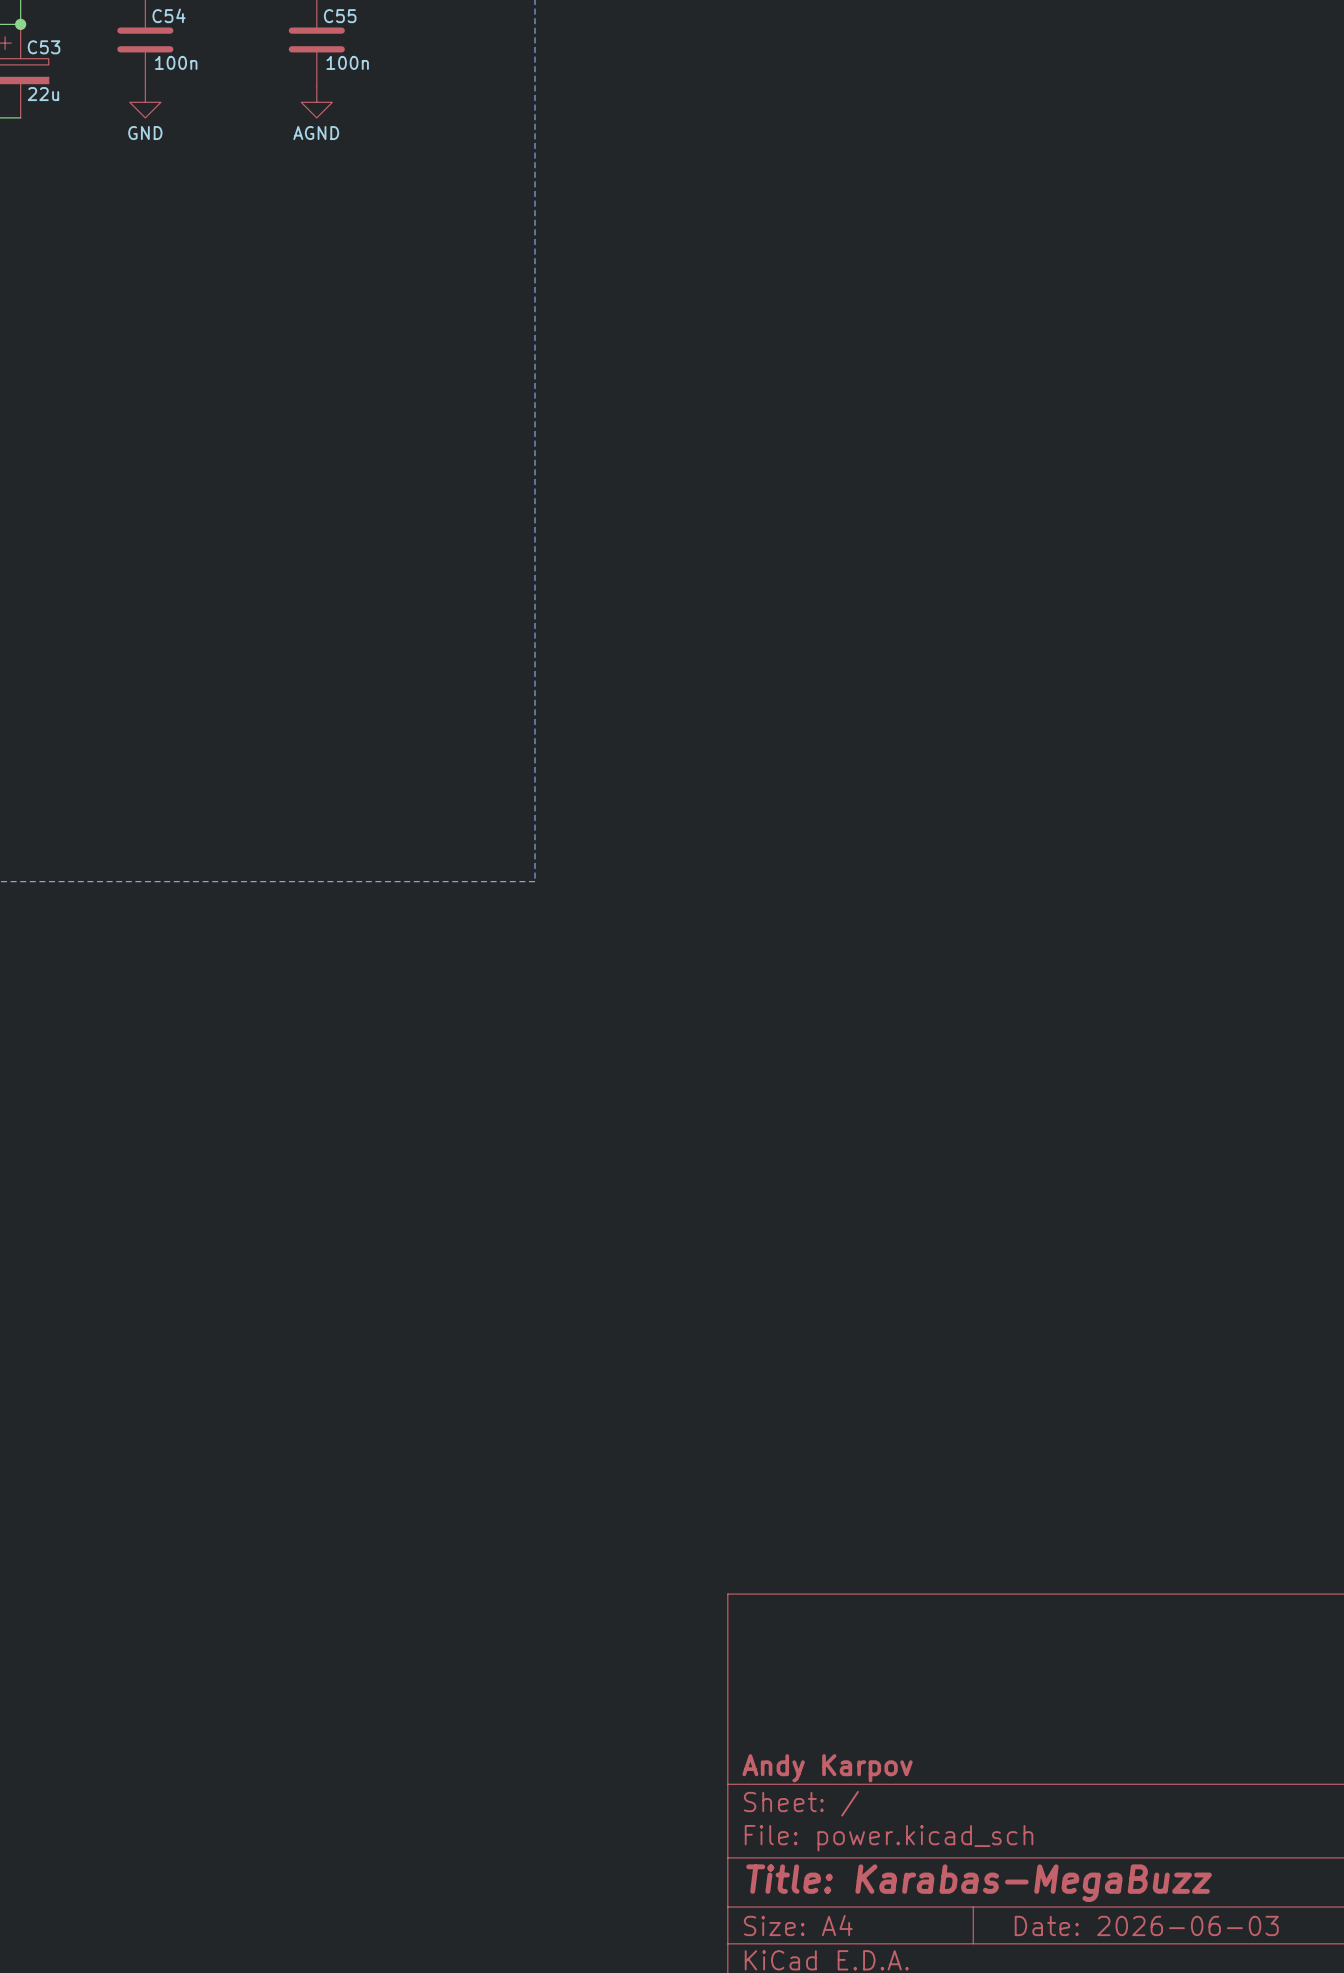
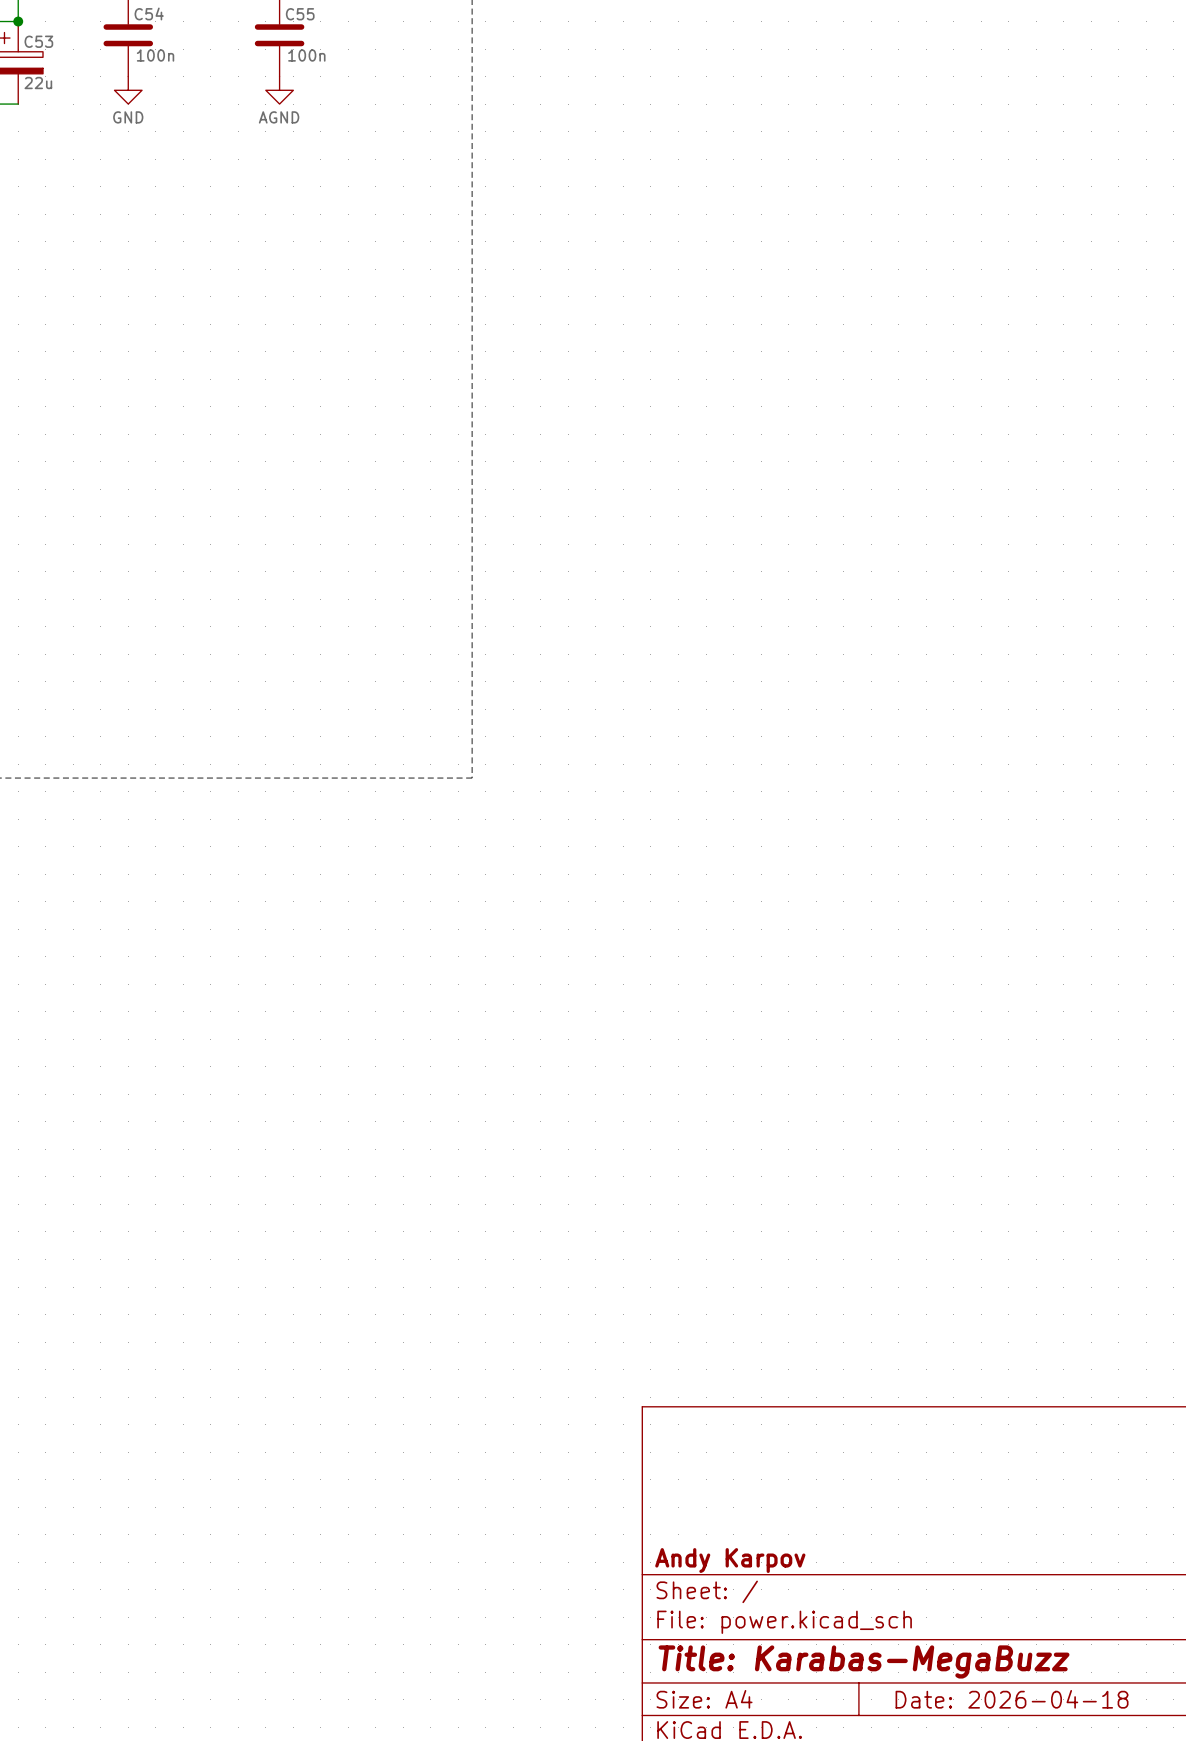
title block: Date: 2026-06-03 (1146, 1925) -> Date: 2026-04-18 (1012, 1699)

